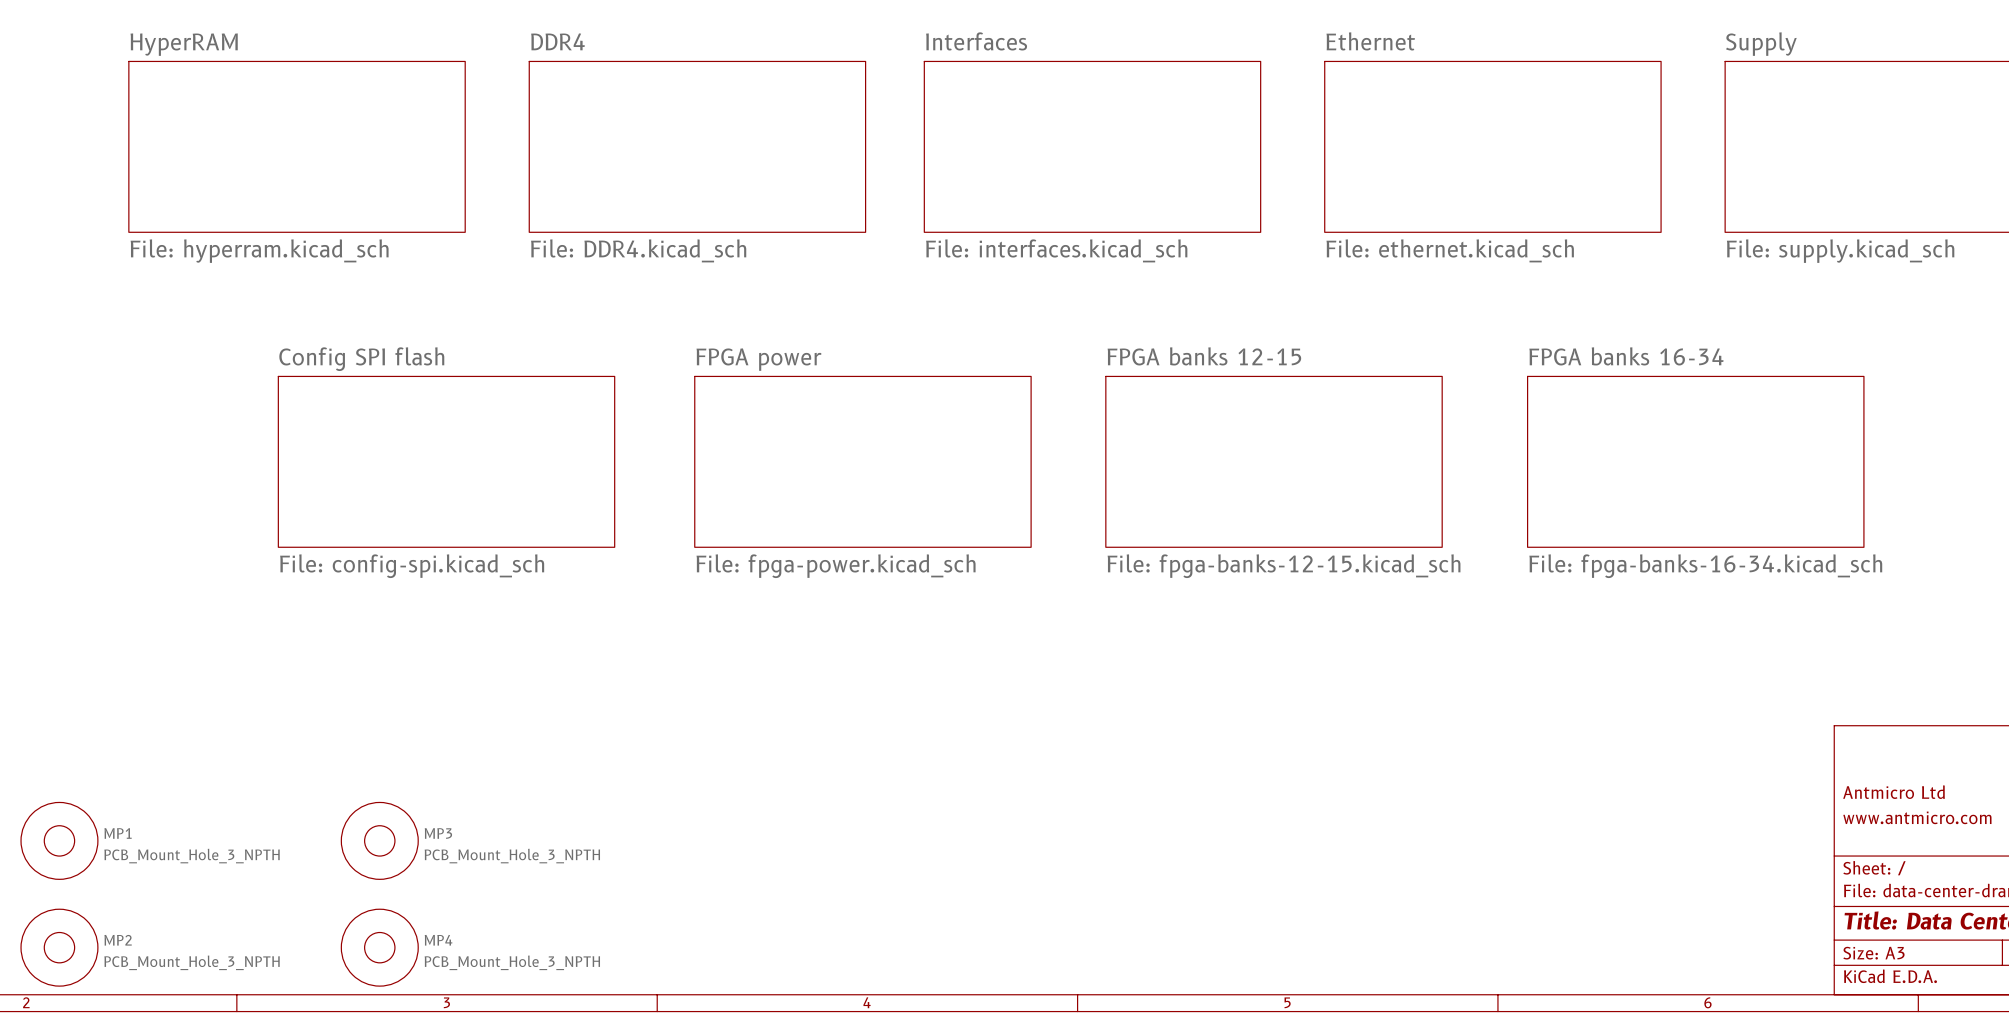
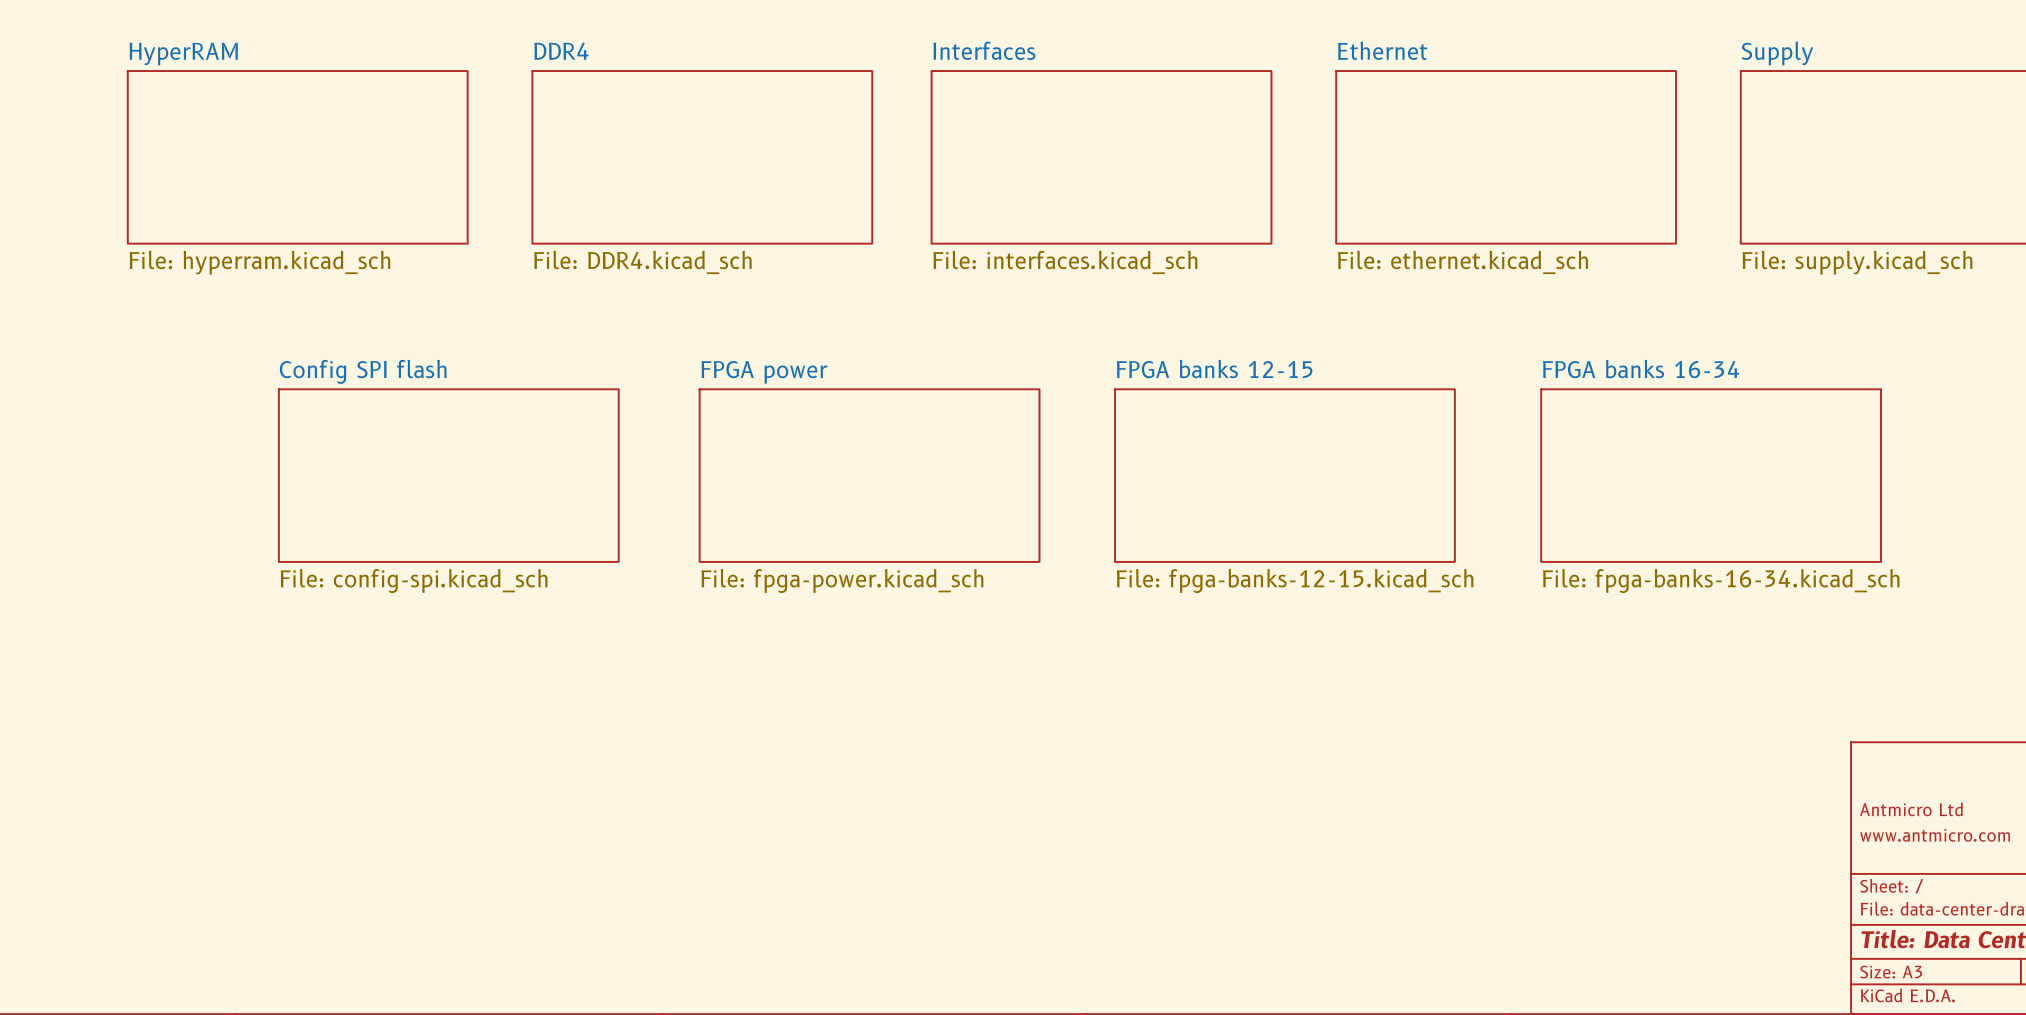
MP1: PCB_Mount_Hole_3_NPTH (59, 840) -> none
MP3: PCB_Mount_Hole_3_NPTH (379, 840) -> none
MP2: PCB_Mount_Hole_3_NPTH (59, 947) -> none
MP4: PCB_Mount_Hole_3_NPTH (379, 947) -> none

